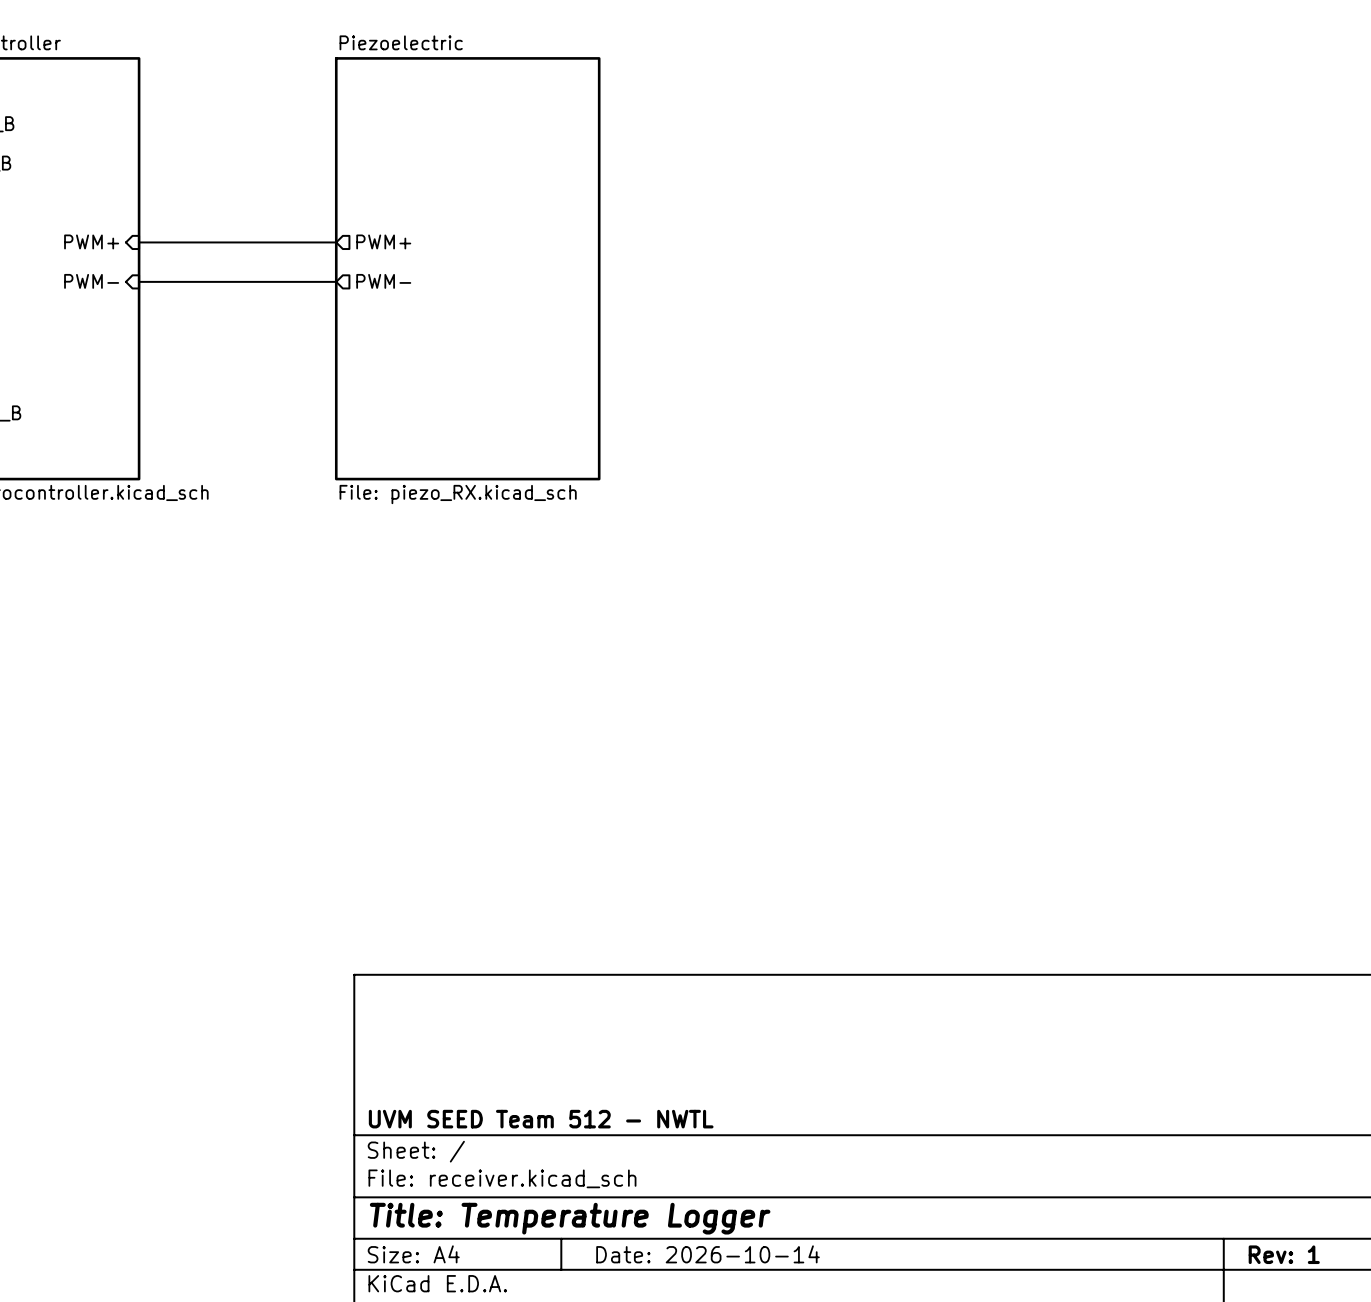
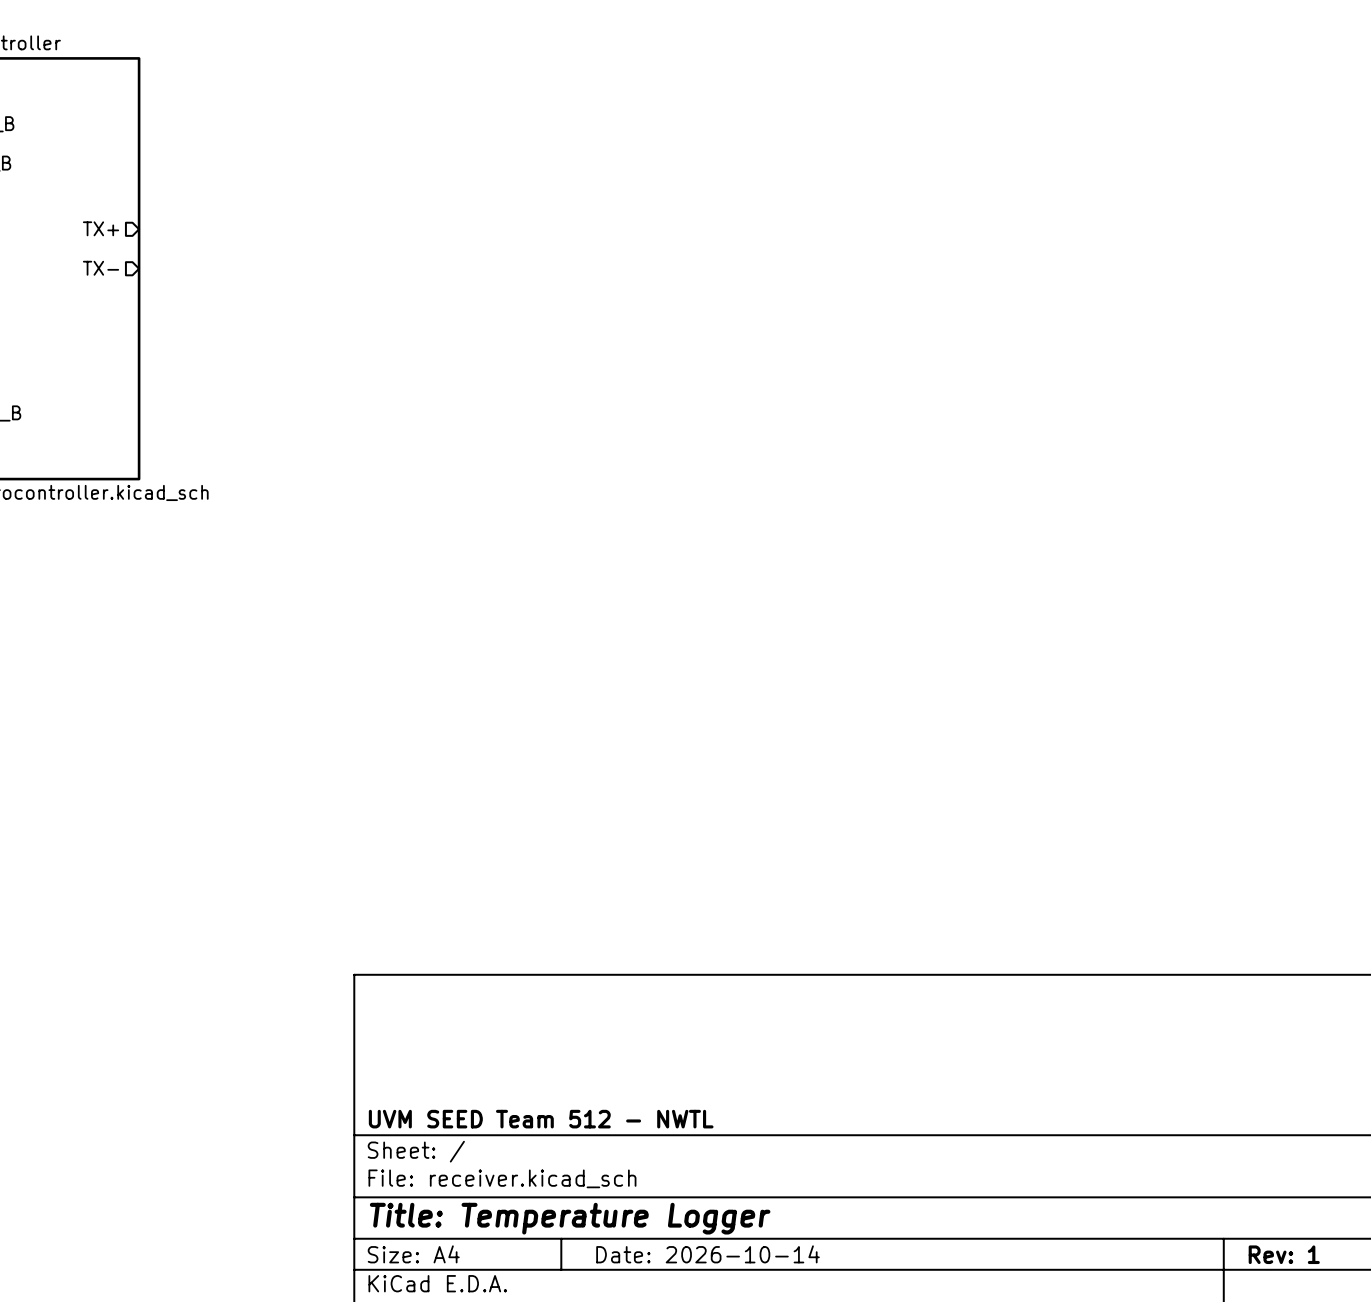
sheet pin: none -> TX+ (101, 228)
sheet pin: PWM+ (91, 241) -> none
sheet pin: PWM+ (383, 241) -> none
wire: (139, 242) (336, 242) -> none
sheet pin: none -> TX- (101, 268)
sheet Piezoelectric: File: piezo_RX.kicad_sch (467, 268) -> none
sheet pin: PWM- (91, 281) -> none
wire: (139, 281) (336, 281) -> none
sheet pin: PWM- (383, 281) -> none

